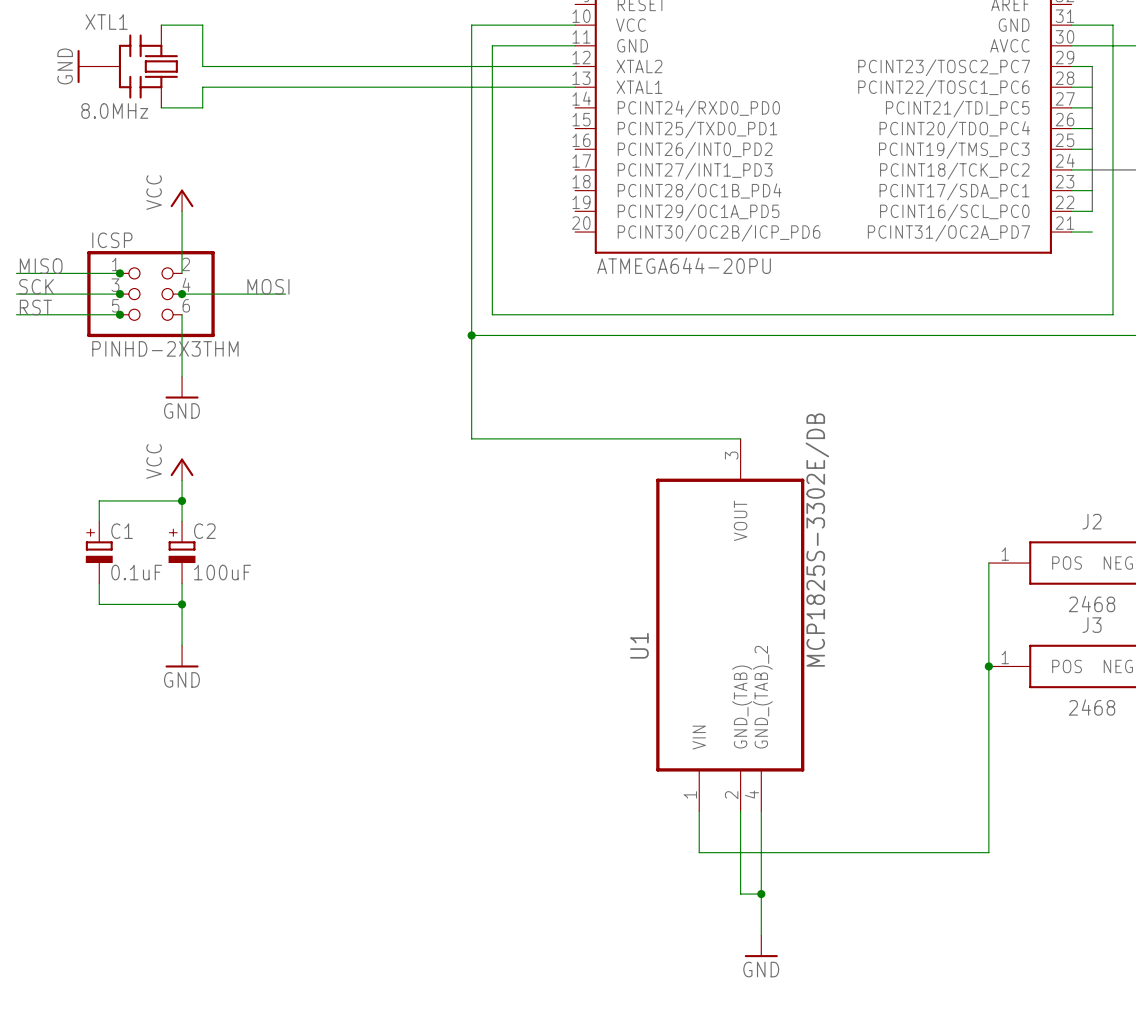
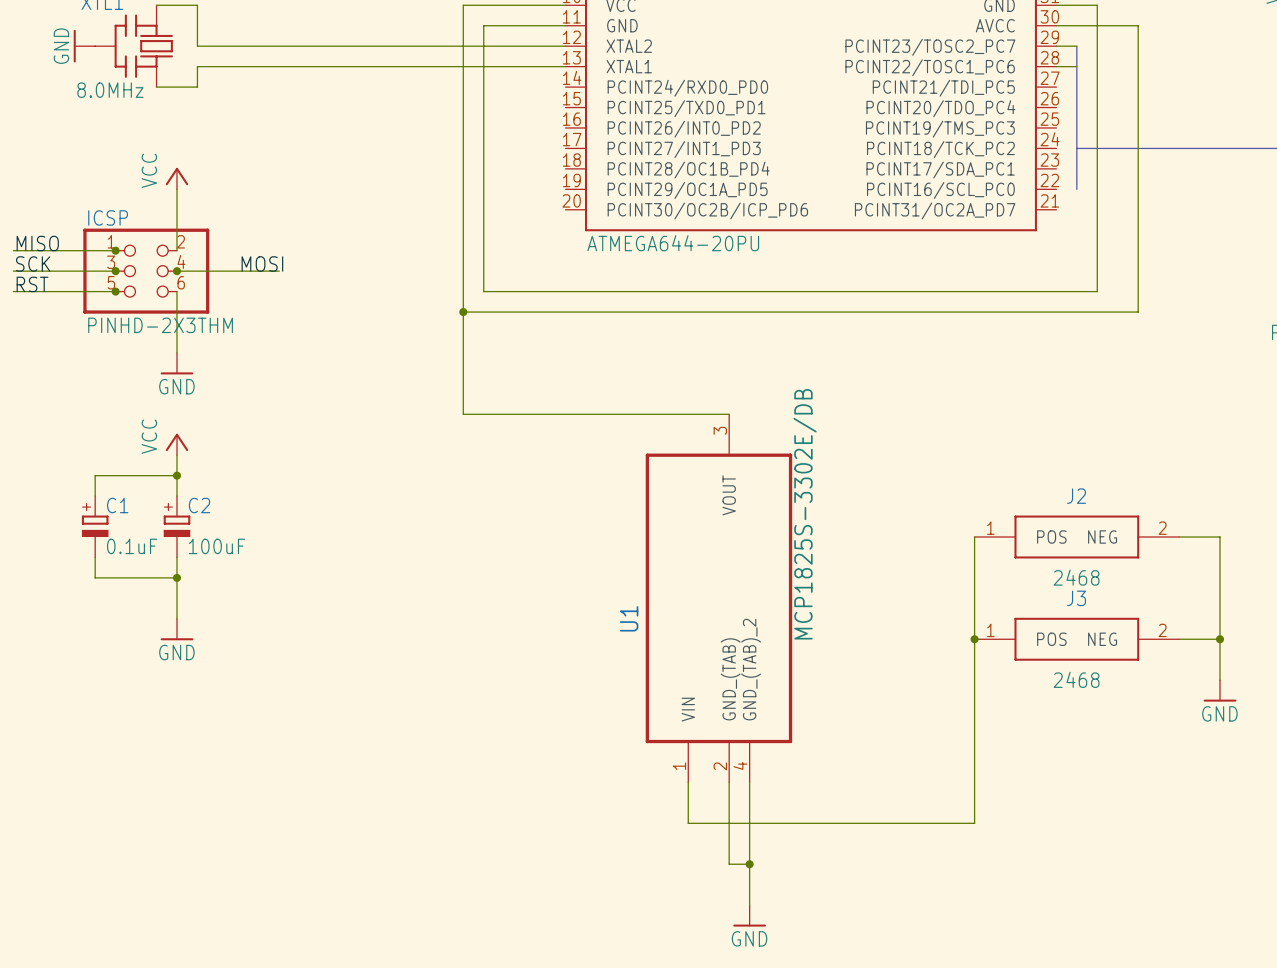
wire: (1071, 107) (1092, 107) -> none
wire: (1071, 128) (1092, 128) -> none
wire: (1071, 149) (1092, 149) -> none
wire: (1071, 169) (1092, 169) -> none
wire: (1071, 190) (1092, 190) -> none
wire: (1071, 211) (1092, 211) -> none
wire: (1071, 232) (1092, 232) -> none

